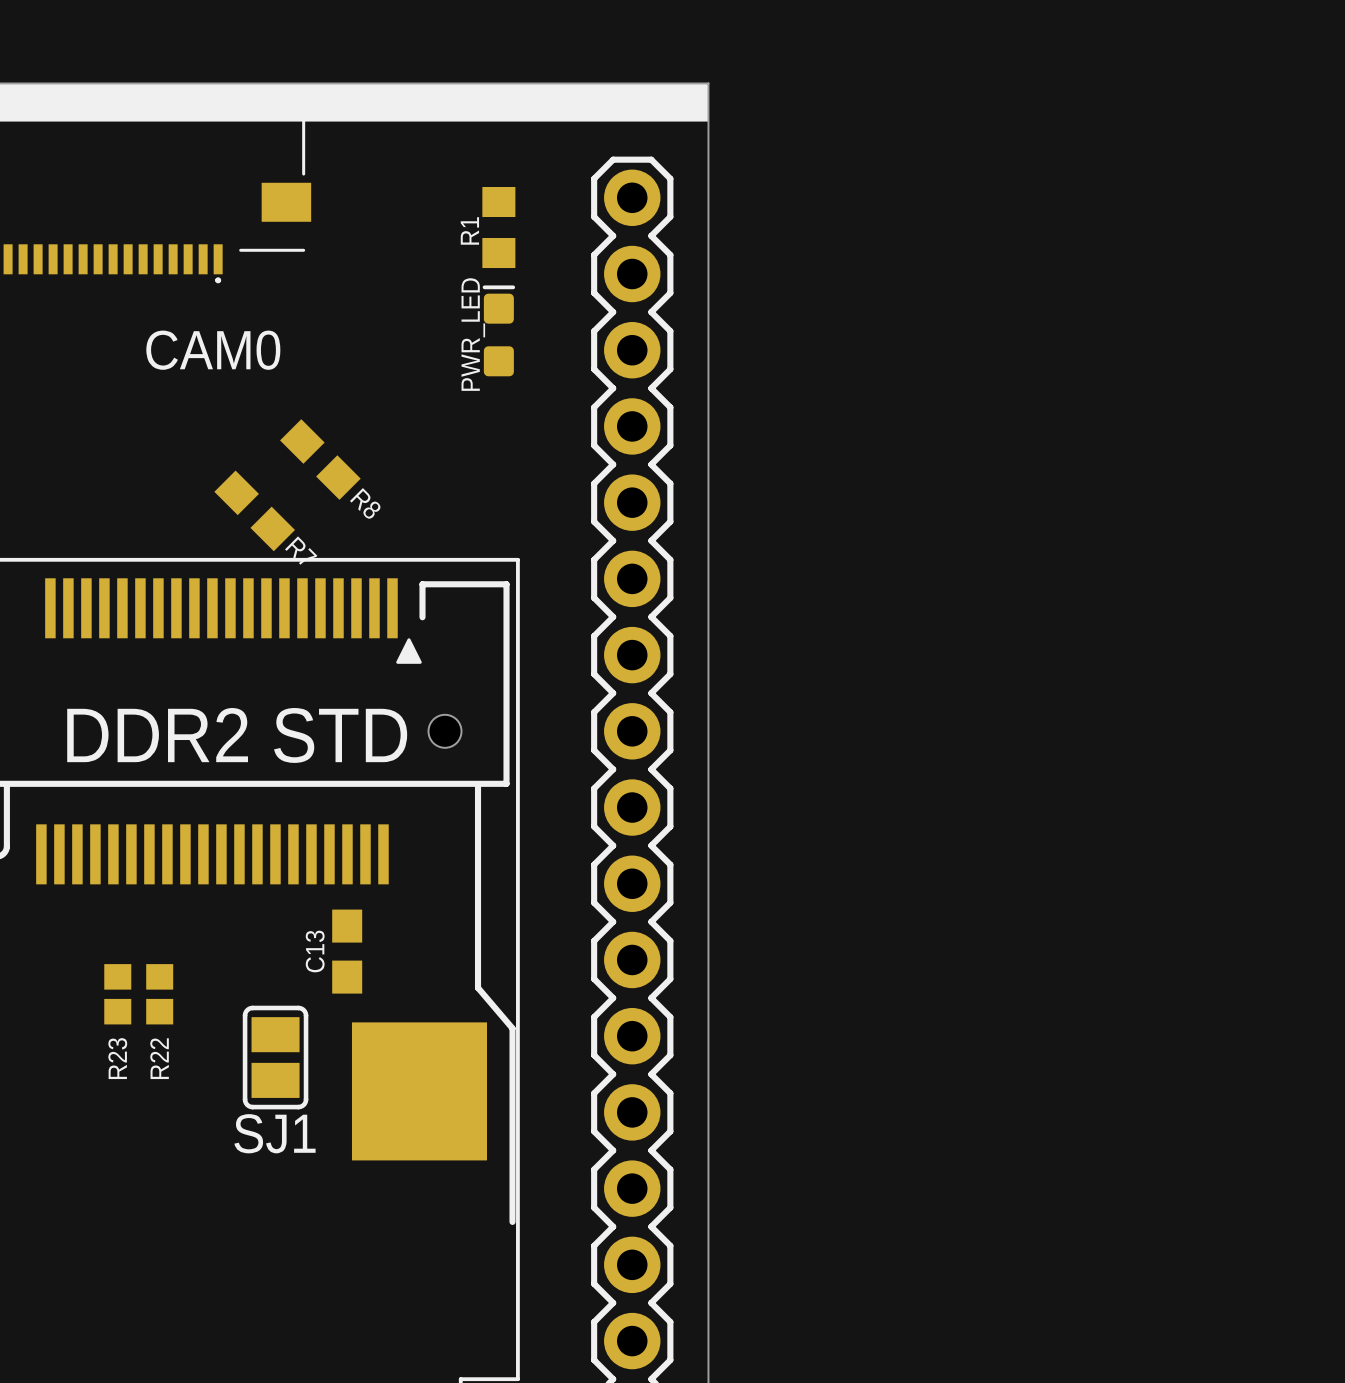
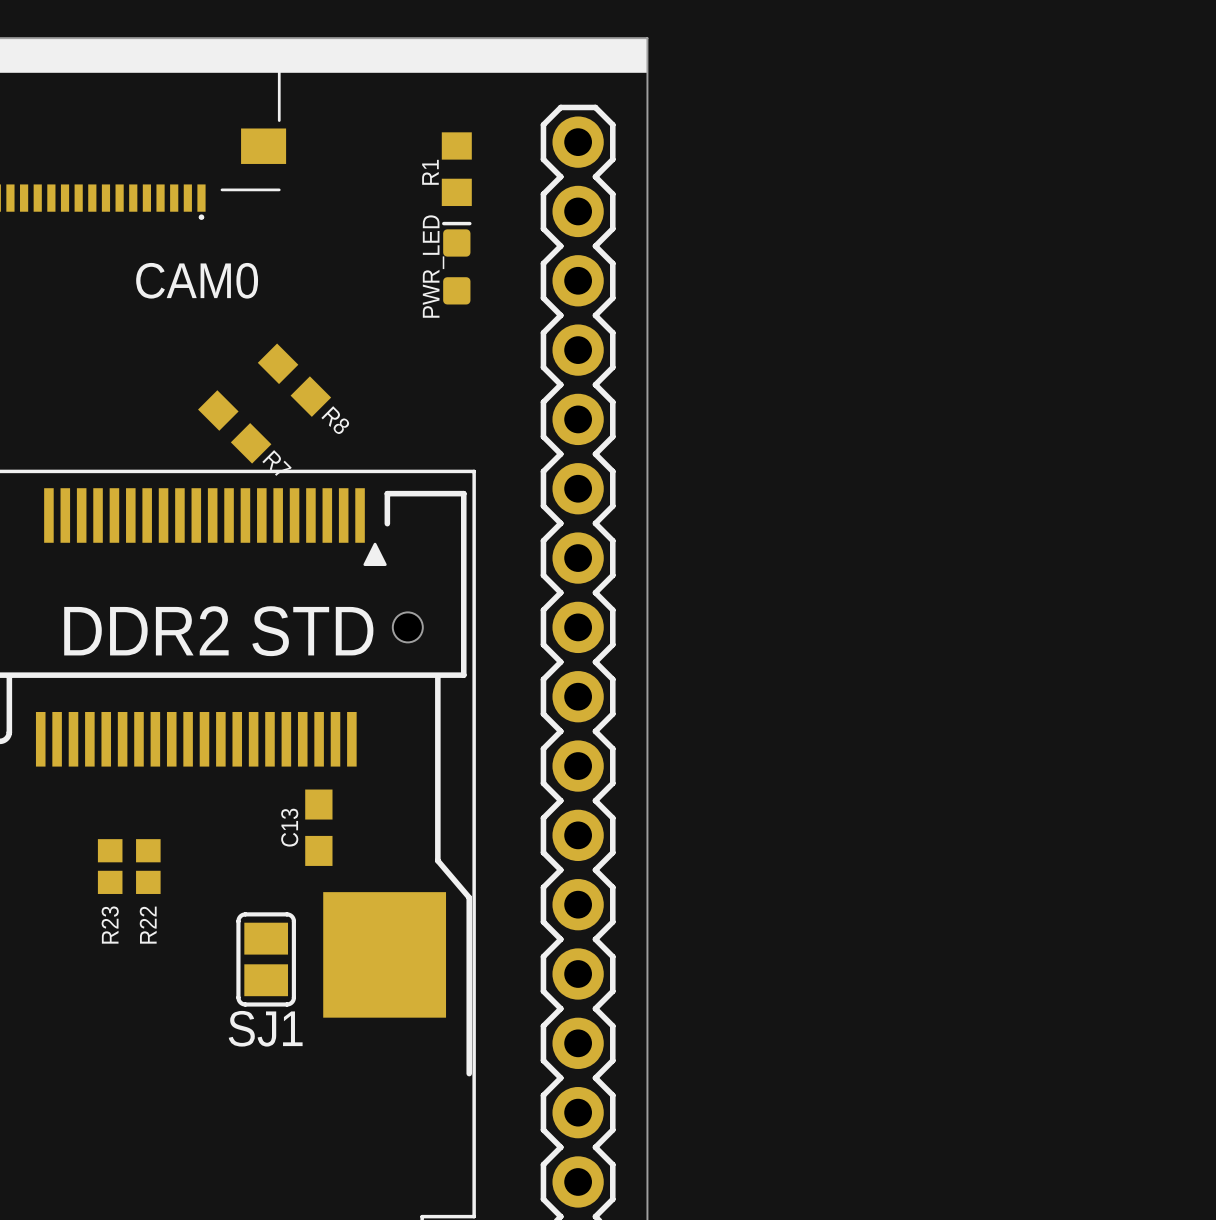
SJ1 position: (275, 1057) -> (266, 959)

